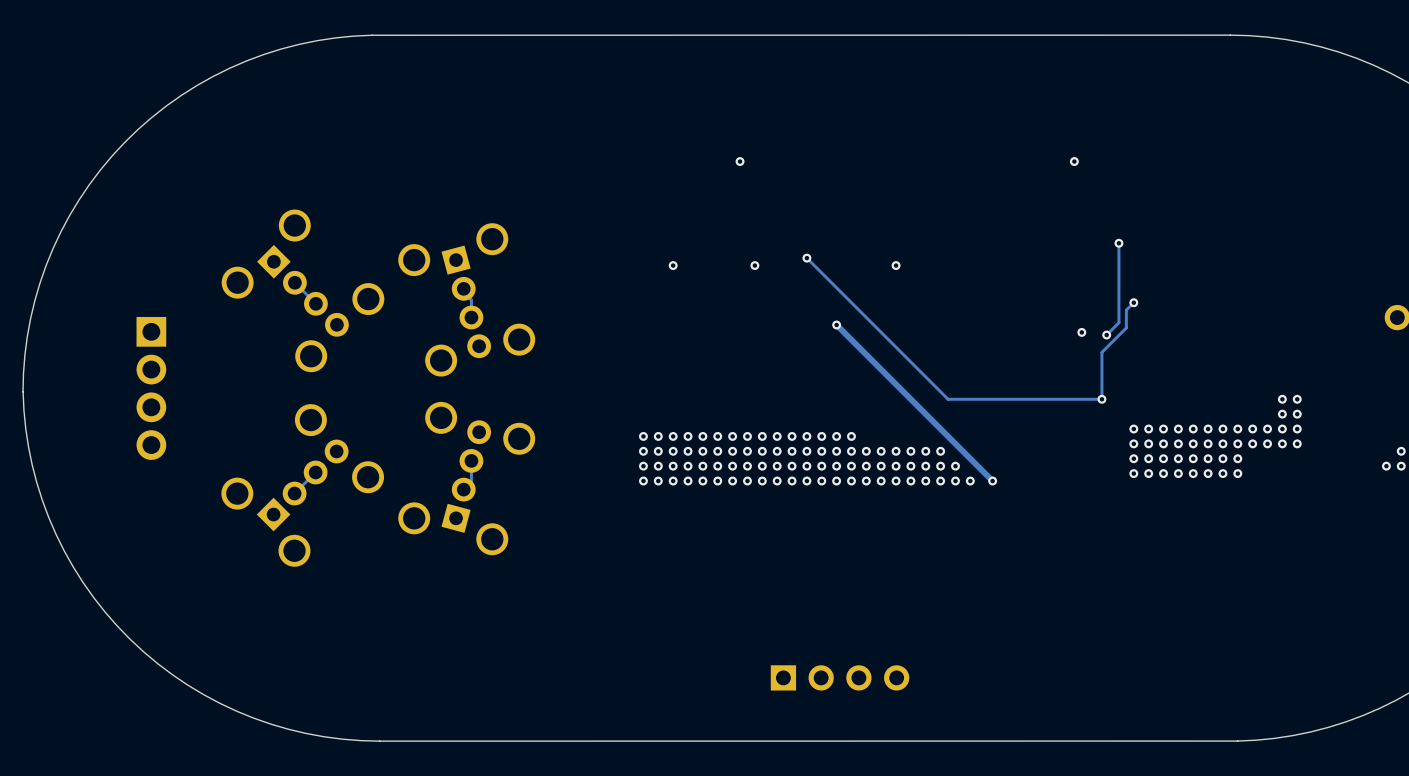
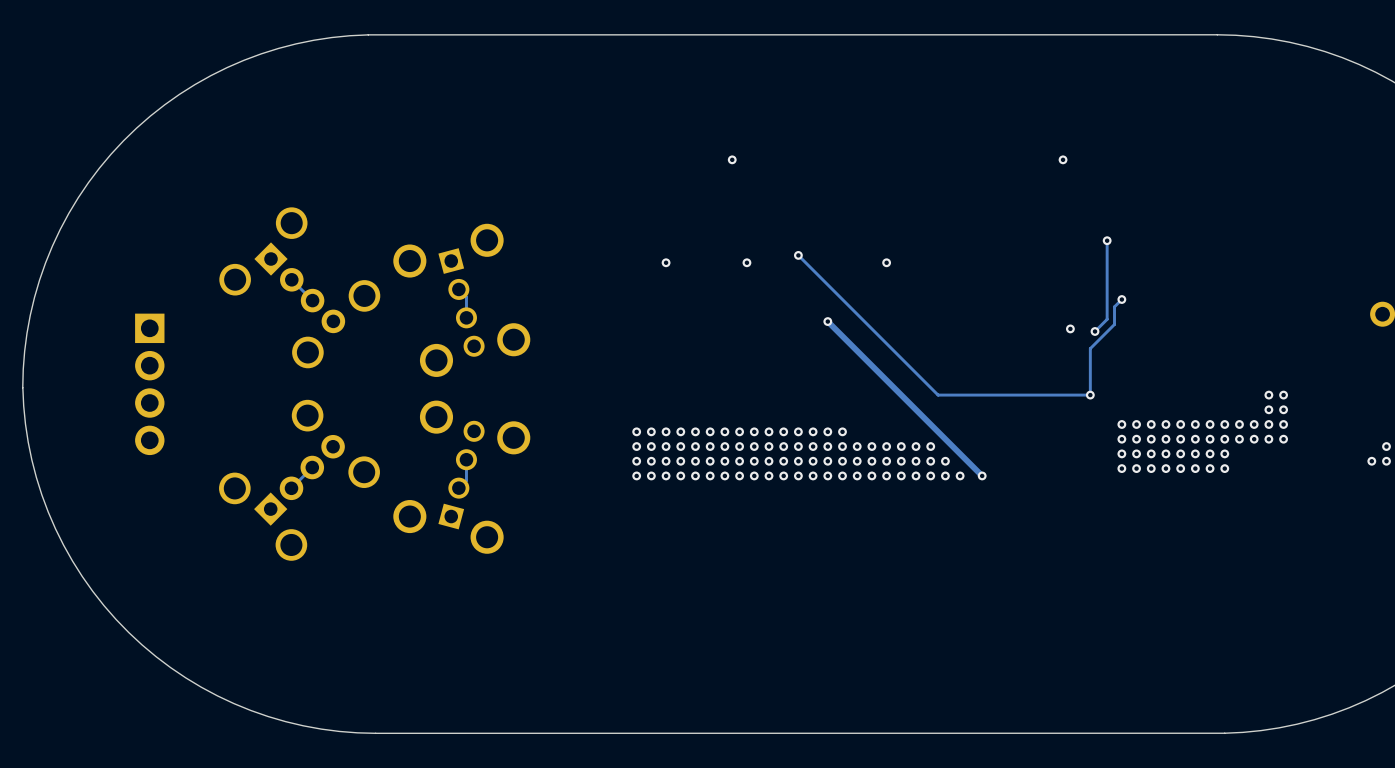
part footprint: [398, 223, 536, 377] -> [393, 223, 531, 377]
part footprint: [398, 401, 536, 556] -> [393, 400, 531, 554]
part: (840, 677) -> none

